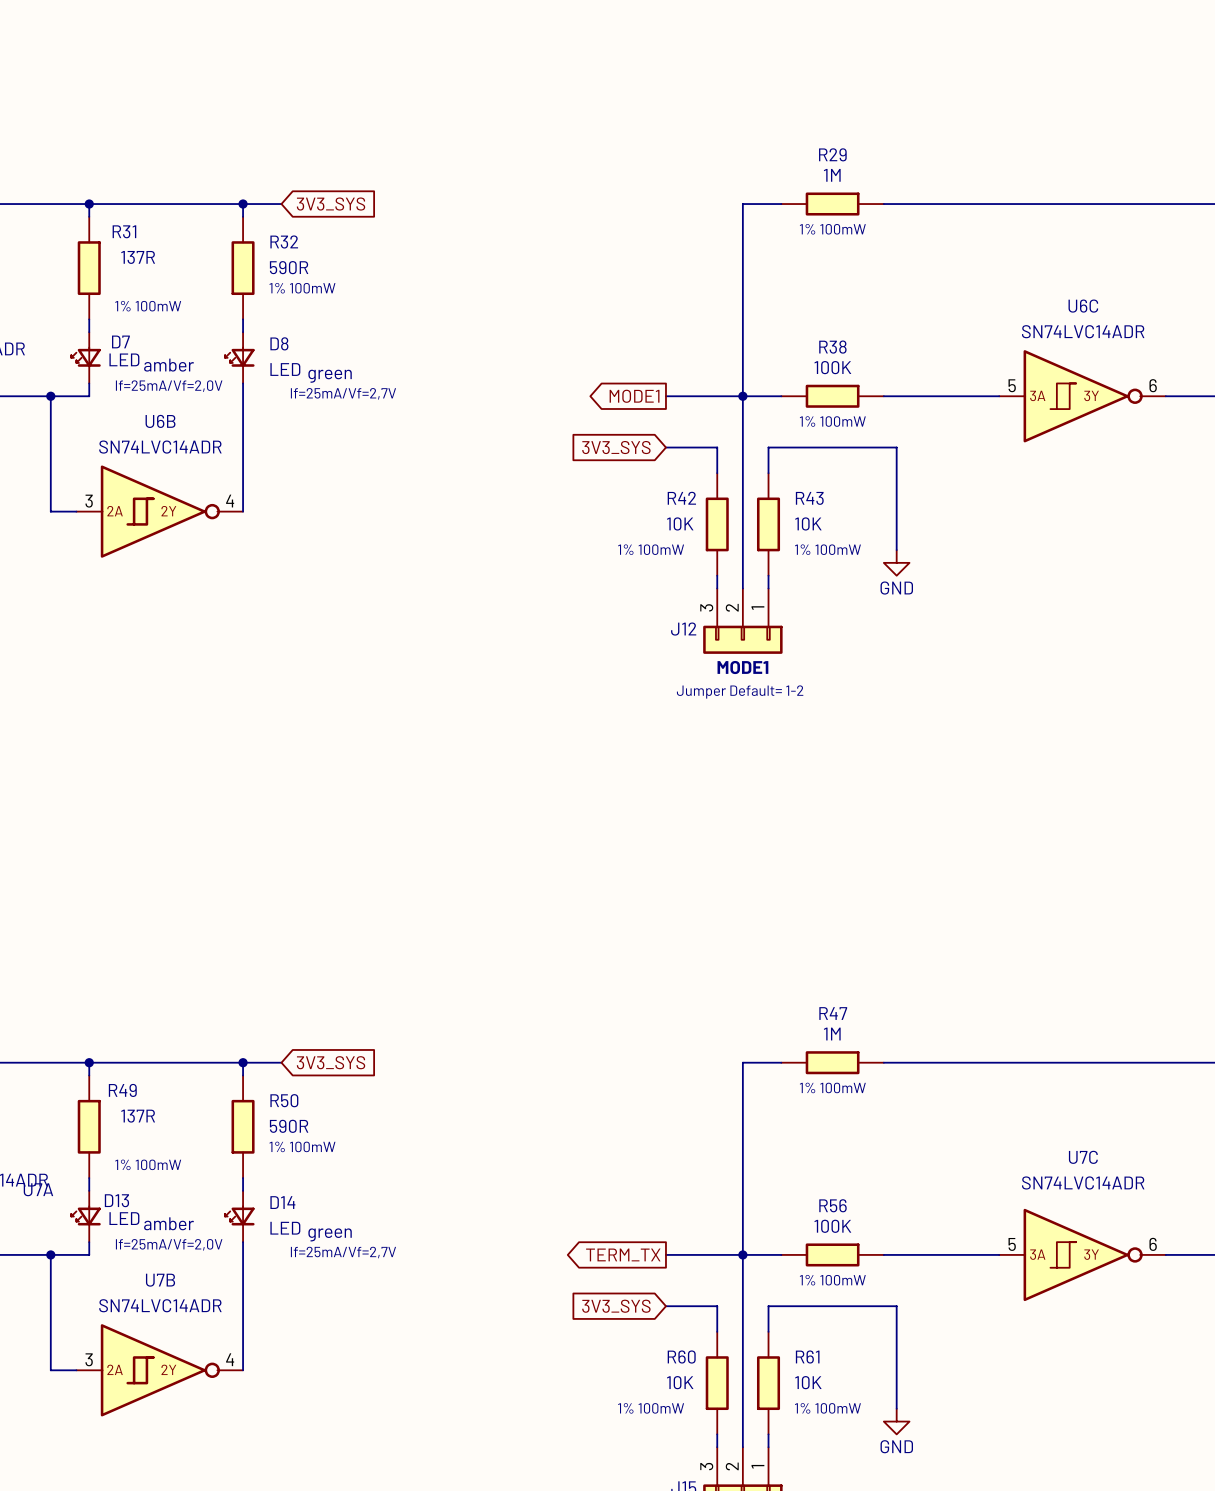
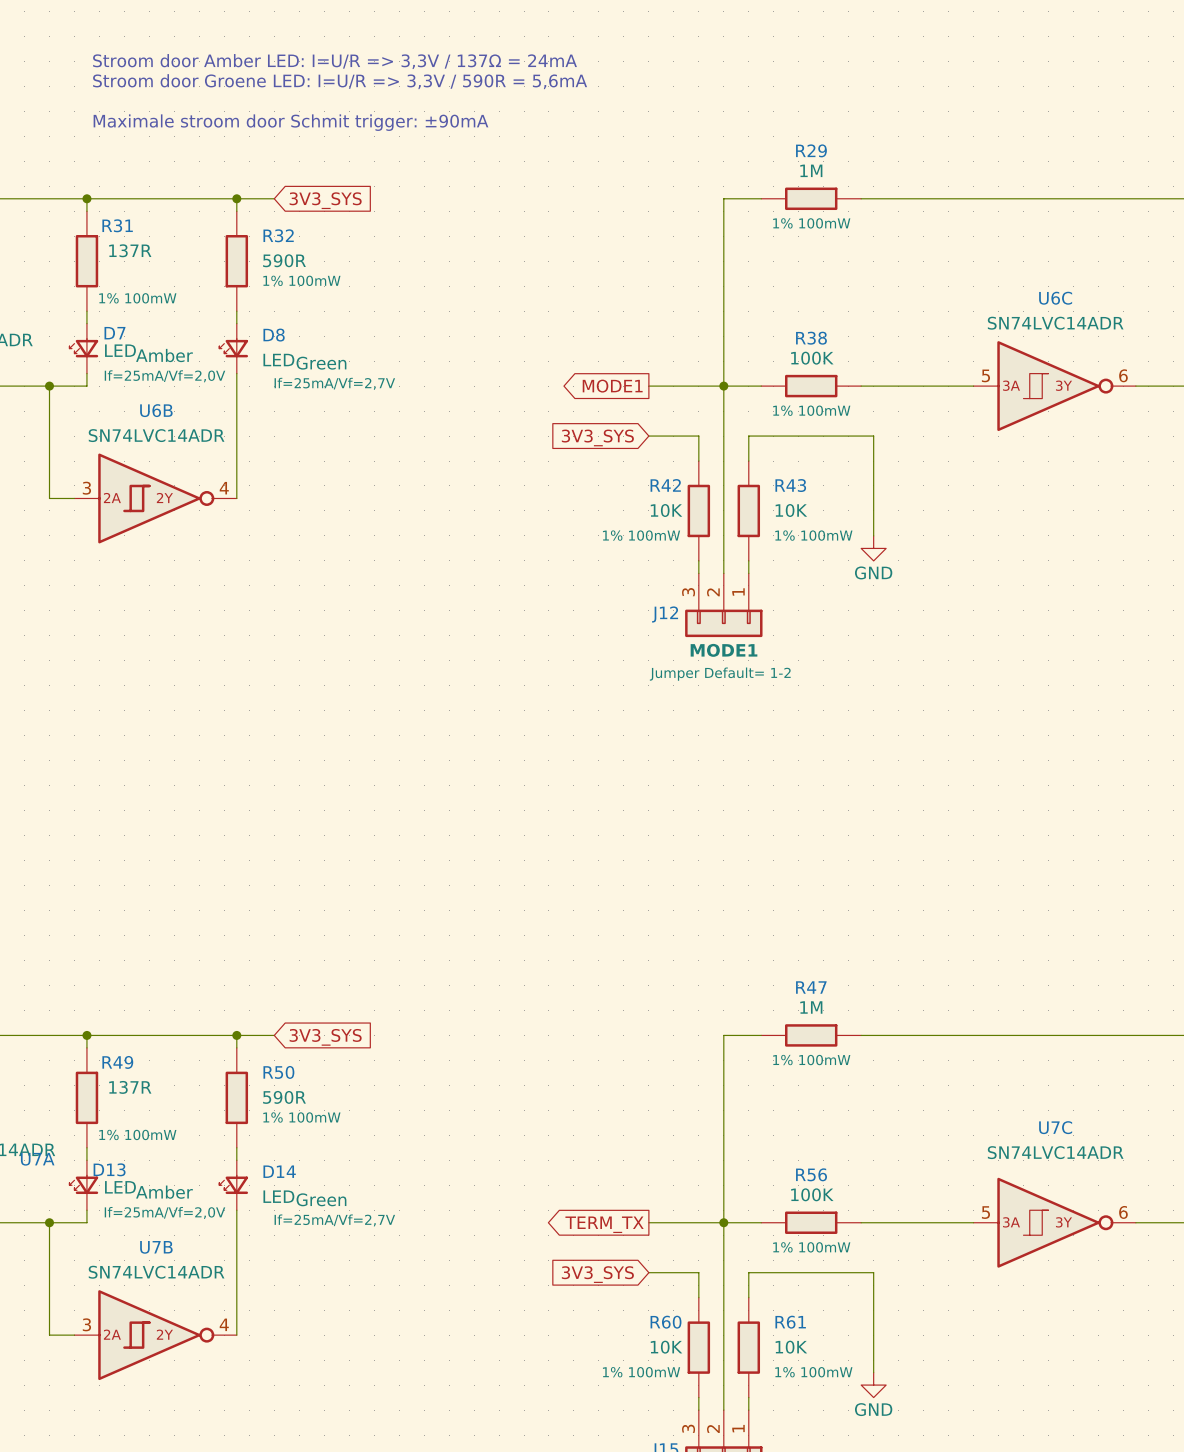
text: none -> Stroom door Amber LED: I=U/R => 3,3V / 137Ω = 24mA (335, 61)
text: none -> Stroom door Groene LED: I=U/R => 3,3V / 590R = 5,6mA (340, 81)
text: none -> Maximale stroom door Schmit trigger: ±90mA (290, 122)
D7 text: amber (168, 365) -> Amber (164, 355)
D8 text: green (330, 376) -> Green (321, 363)
D13 text: amber (168, 1223) -> Amber (164, 1192)
D14 text: green (330, 1234) -> Green (321, 1199)

